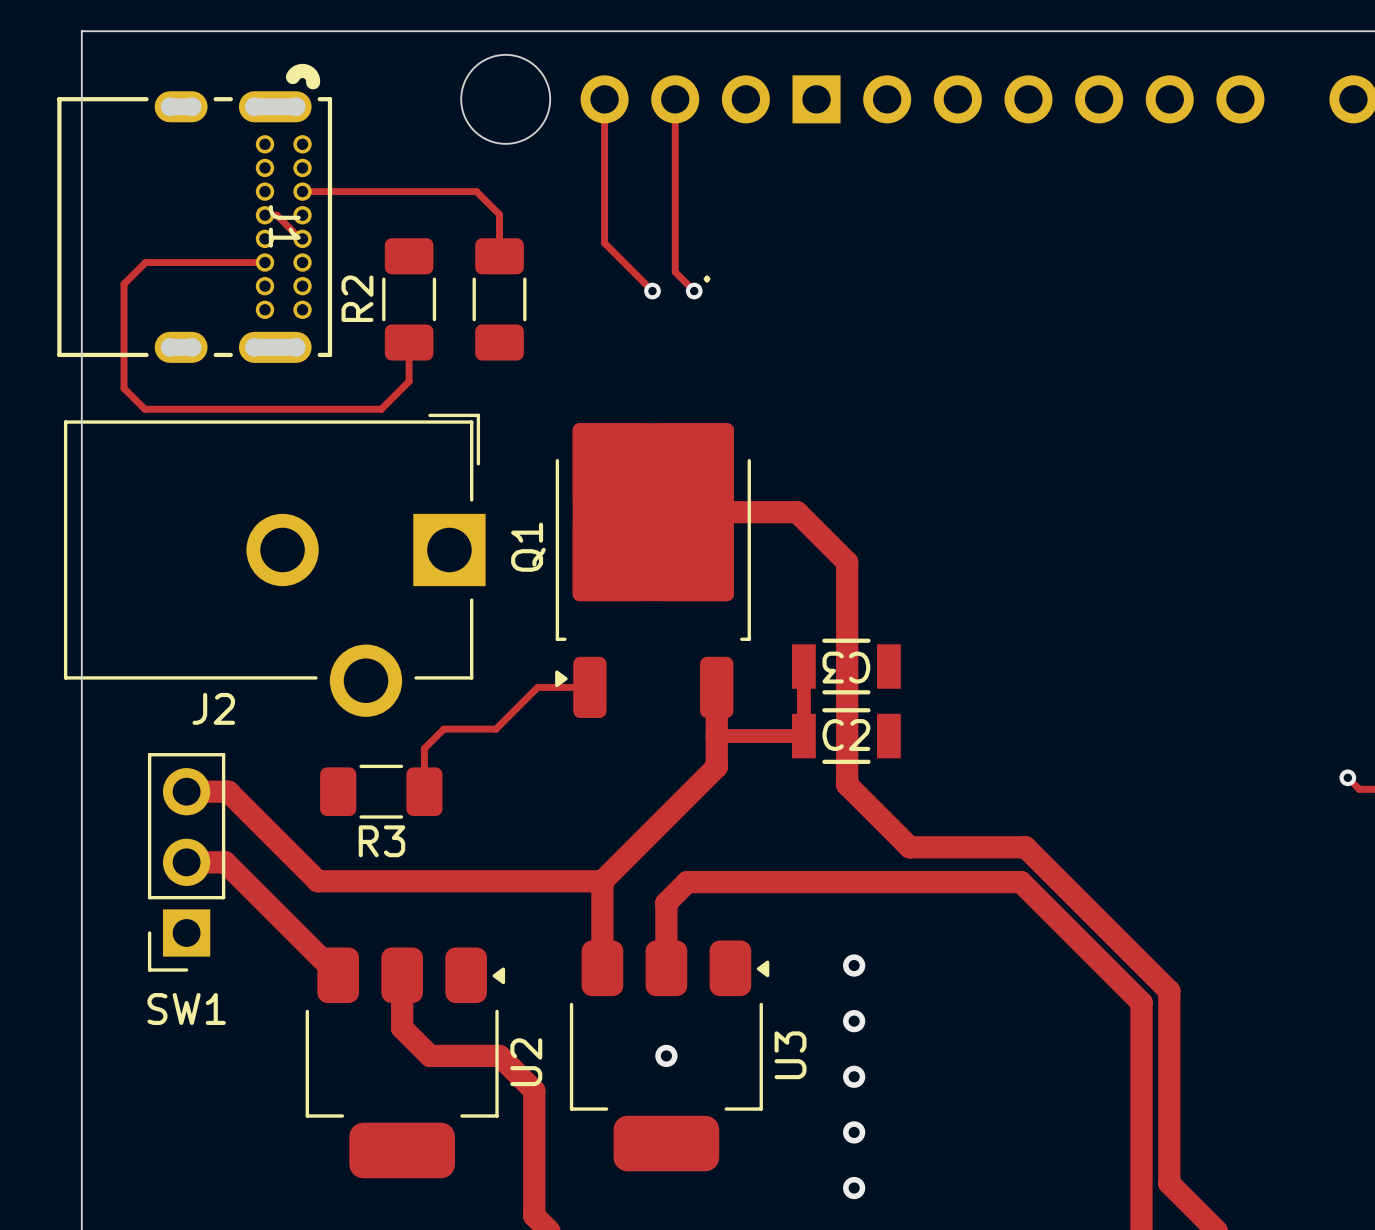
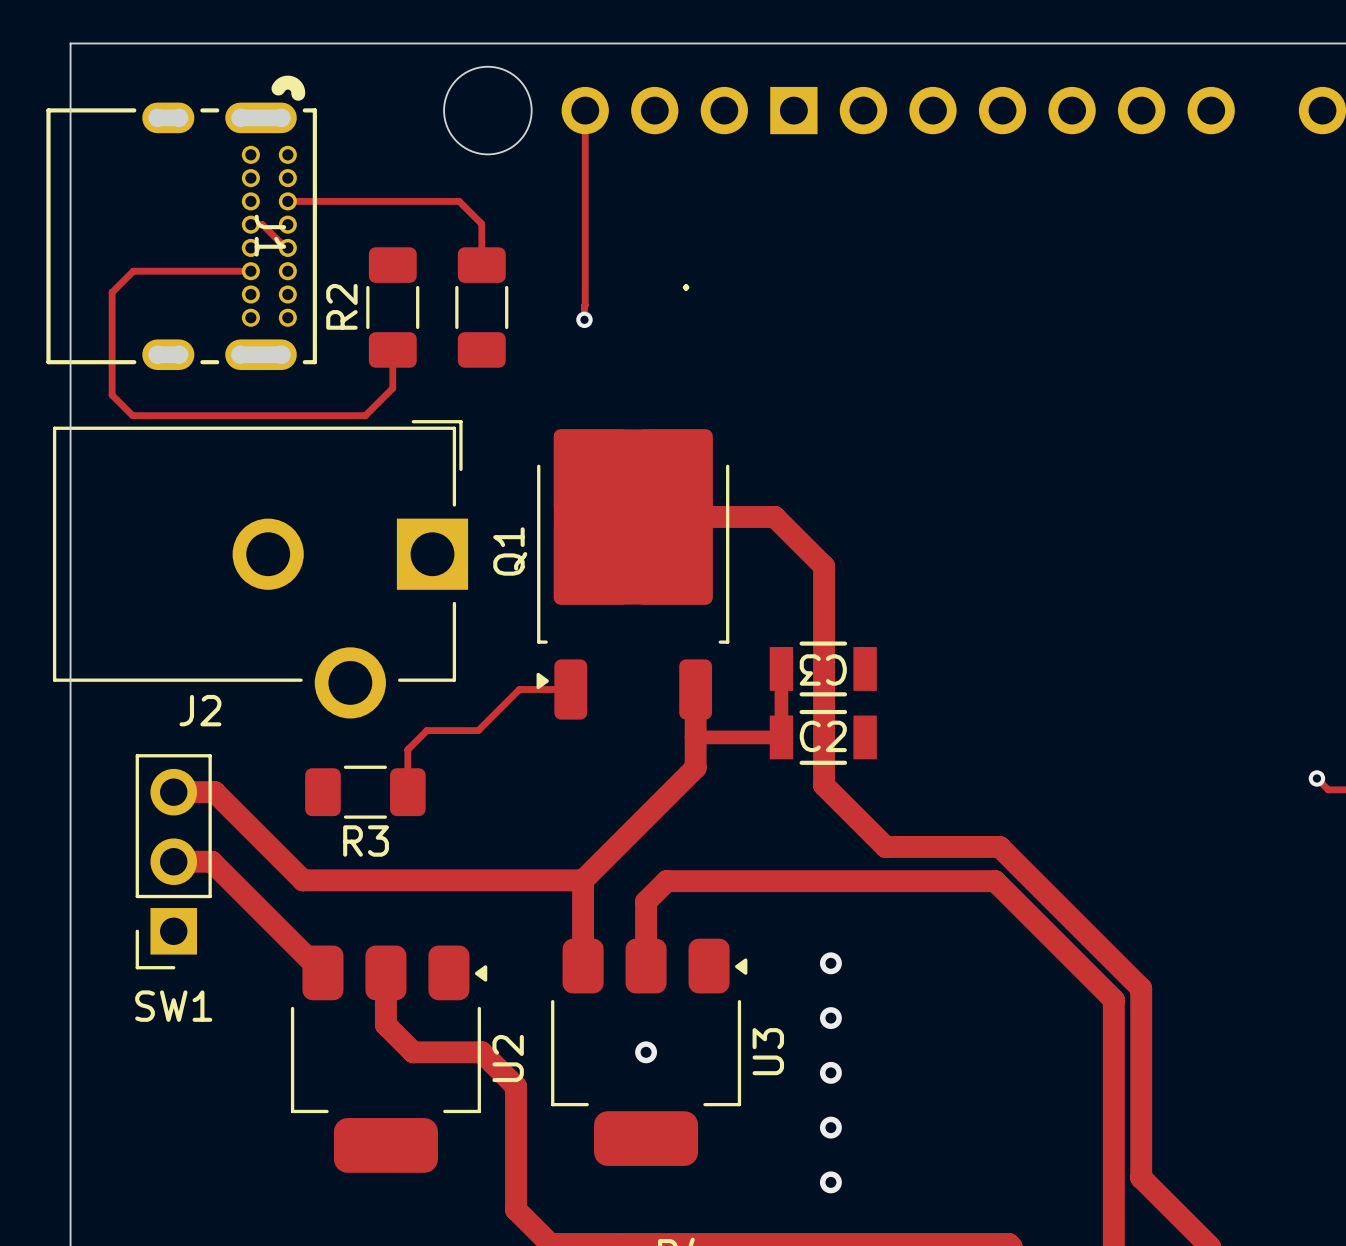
track: (675, 99) (675, 272) (694, 291) -> none
track: (604, 243) (652, 291) -> (585, 252) (584, 319)
via: (652, 291) -> none
via: (694, 291) -> none
via: none -> (584, 319)

